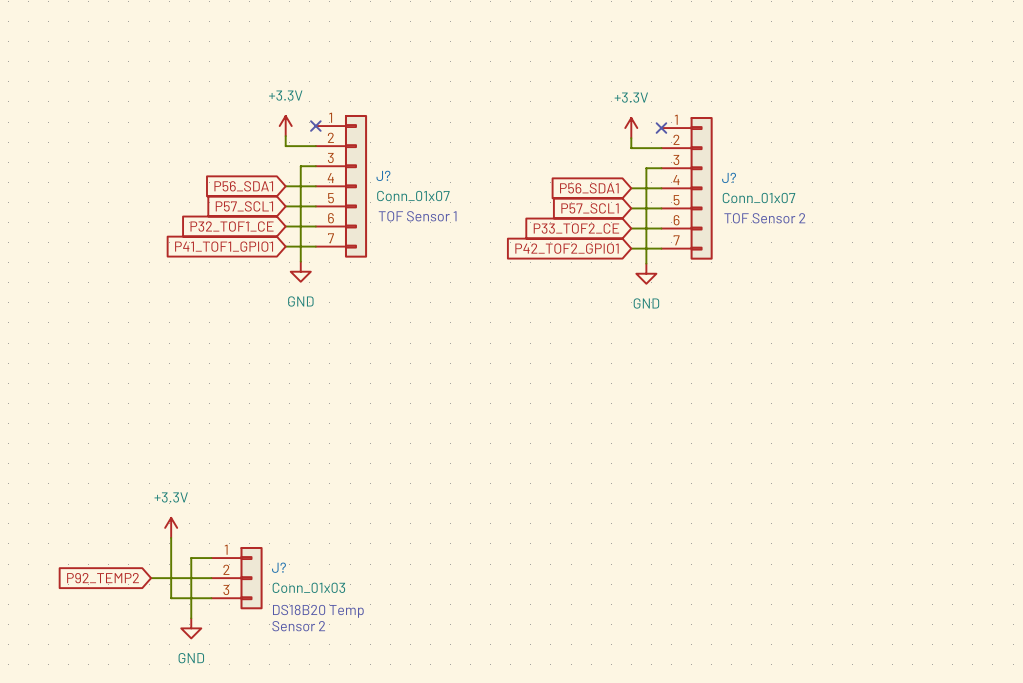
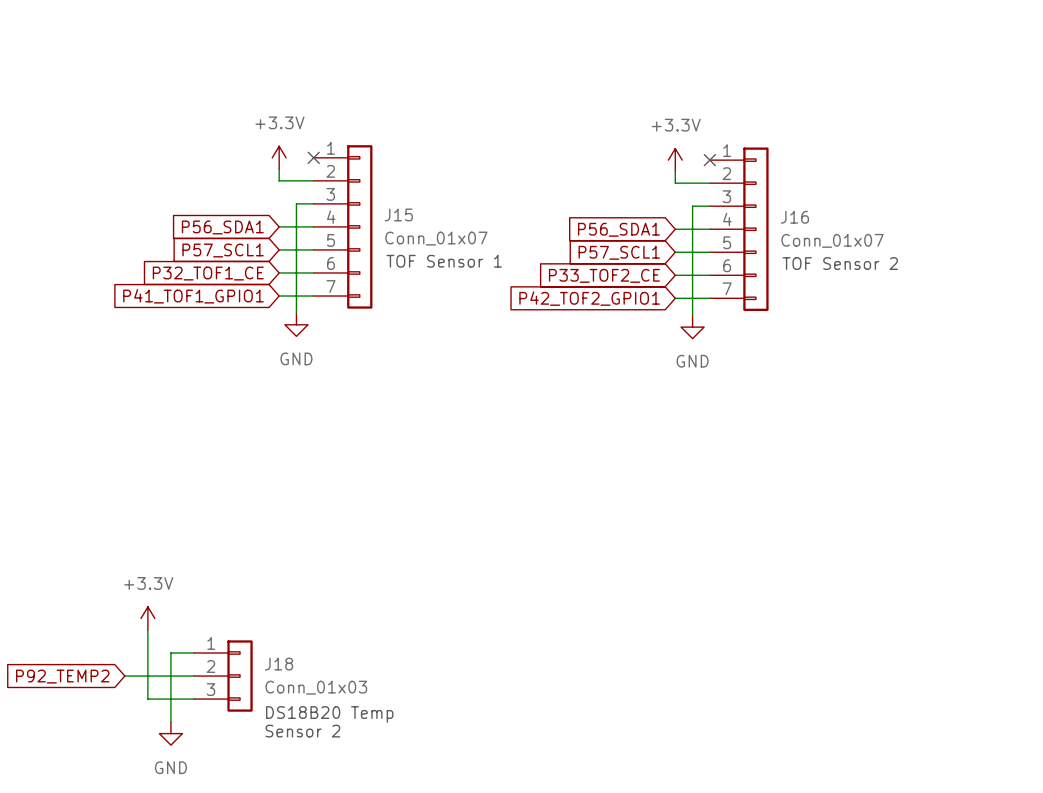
J? name: J? (383, 175) -> J15 (398, 214)
J? name: J? (729, 177) -> J16 (794, 217)
J? name: J? (278, 567) -> J18 (279, 664)

